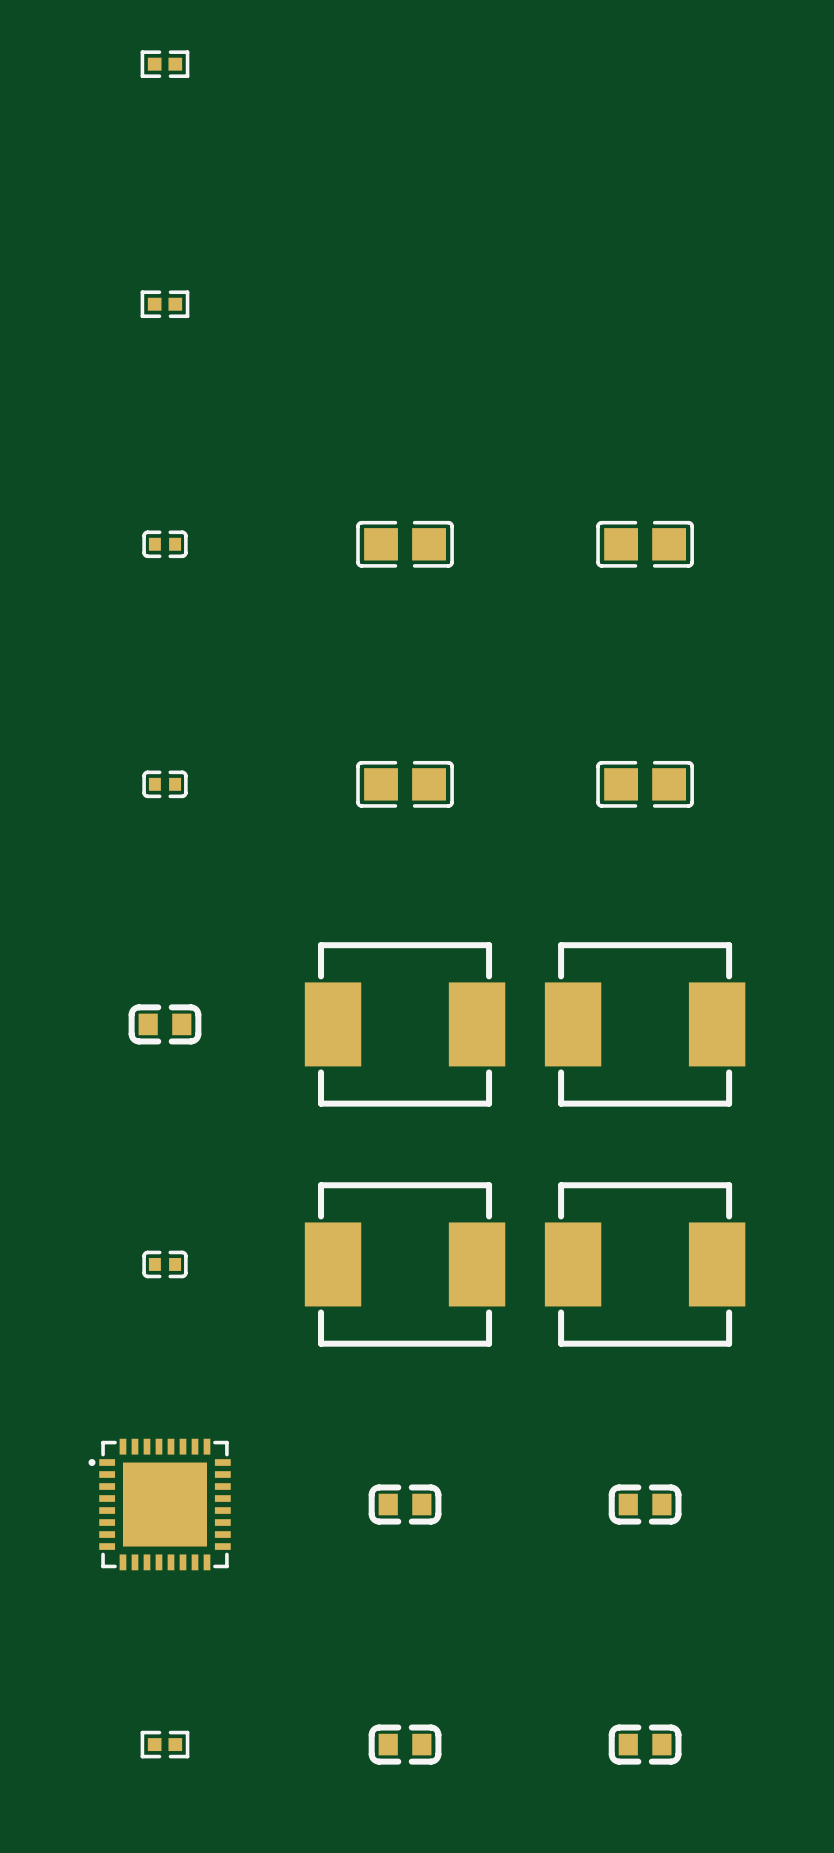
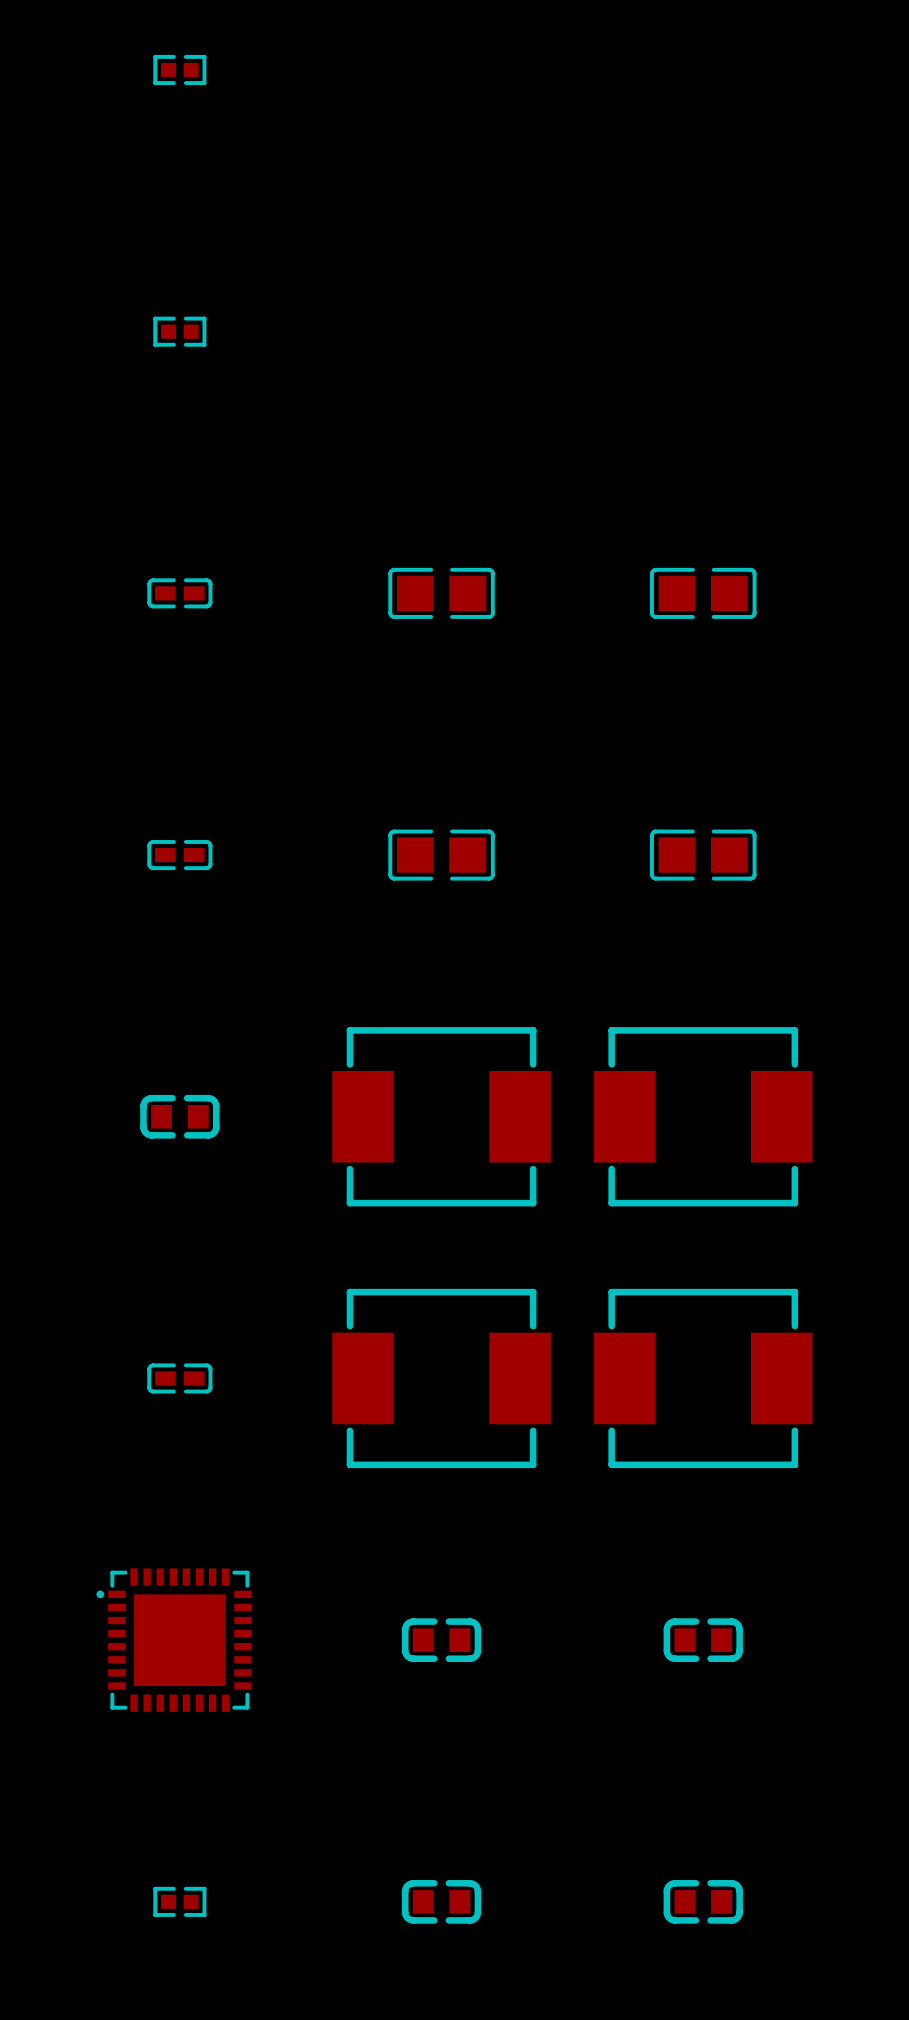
part footprint: [142, 530, 188, 559] -> [147, 578, 213, 609]
part footprint: [142, 770, 188, 799] -> [147, 840, 213, 871]
part footprint: [142, 1250, 188, 1279] -> [147, 1363, 213, 1394]

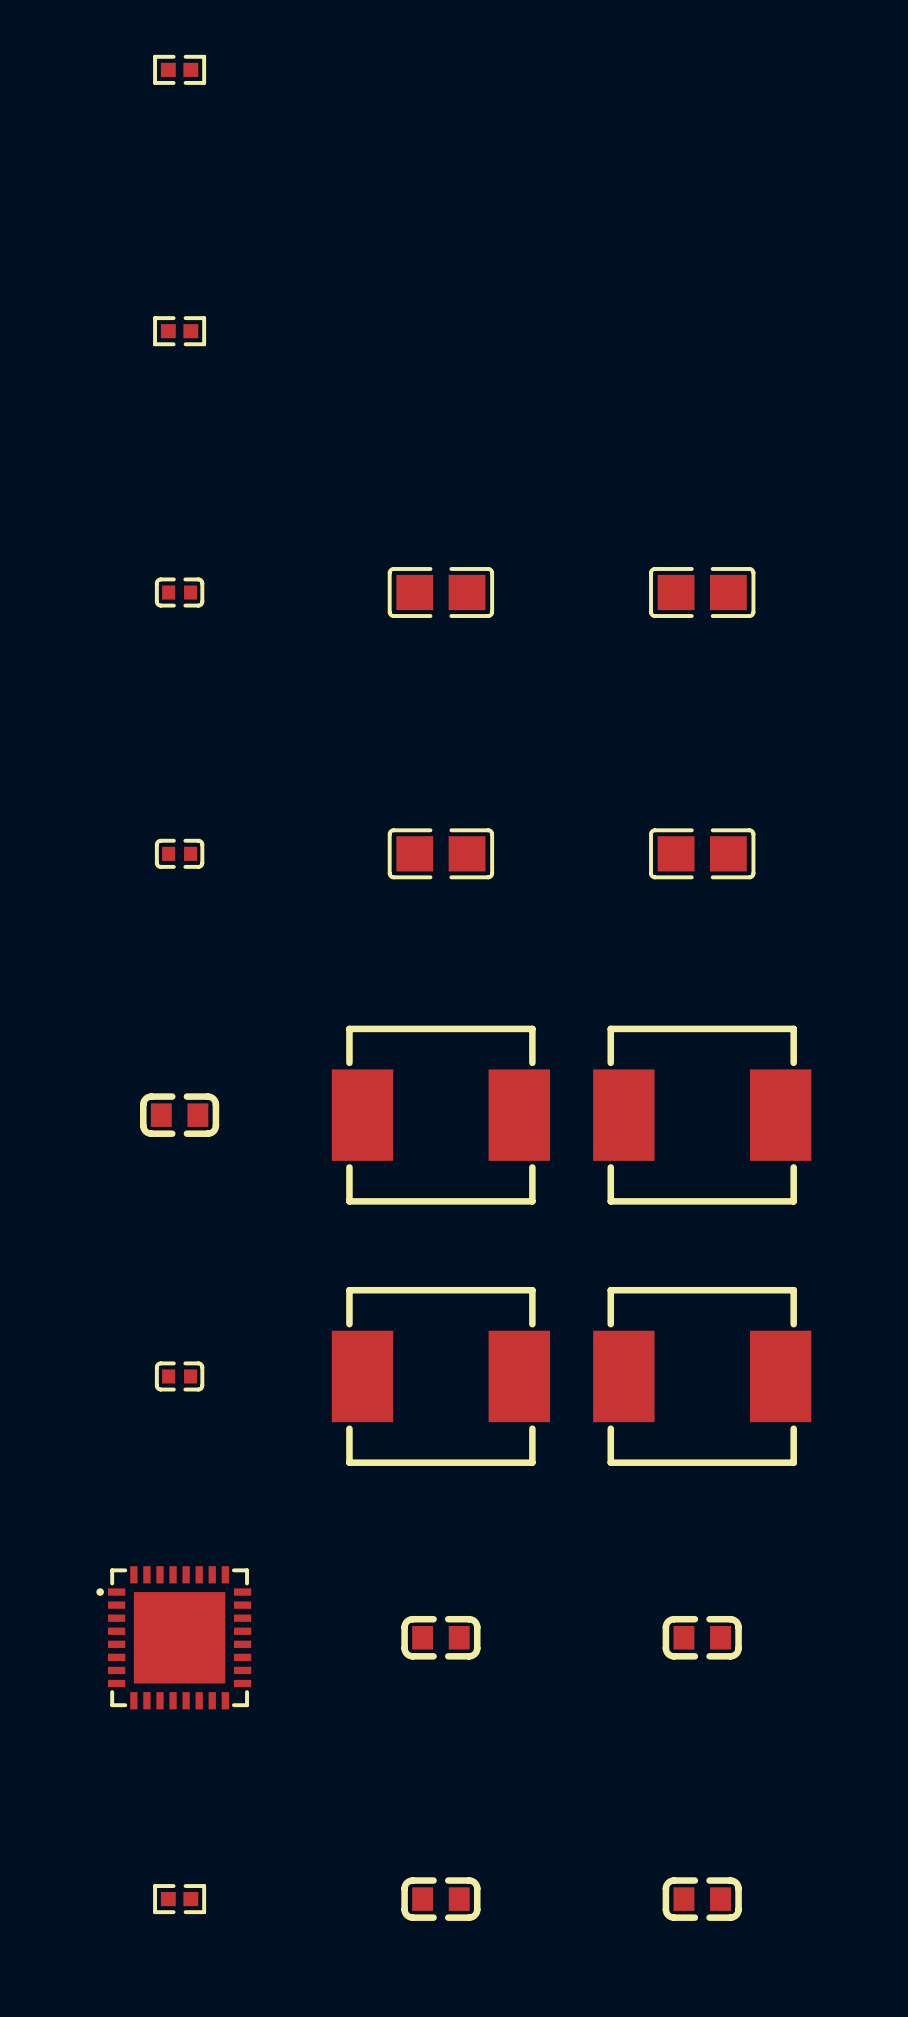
part footprint: [147, 578, 213, 609] -> [154, 577, 205, 608]
part footprint: [147, 840, 213, 871] -> [154, 838, 205, 869]
part footprint: [147, 1363, 213, 1394] -> [154, 1361, 205, 1392]

